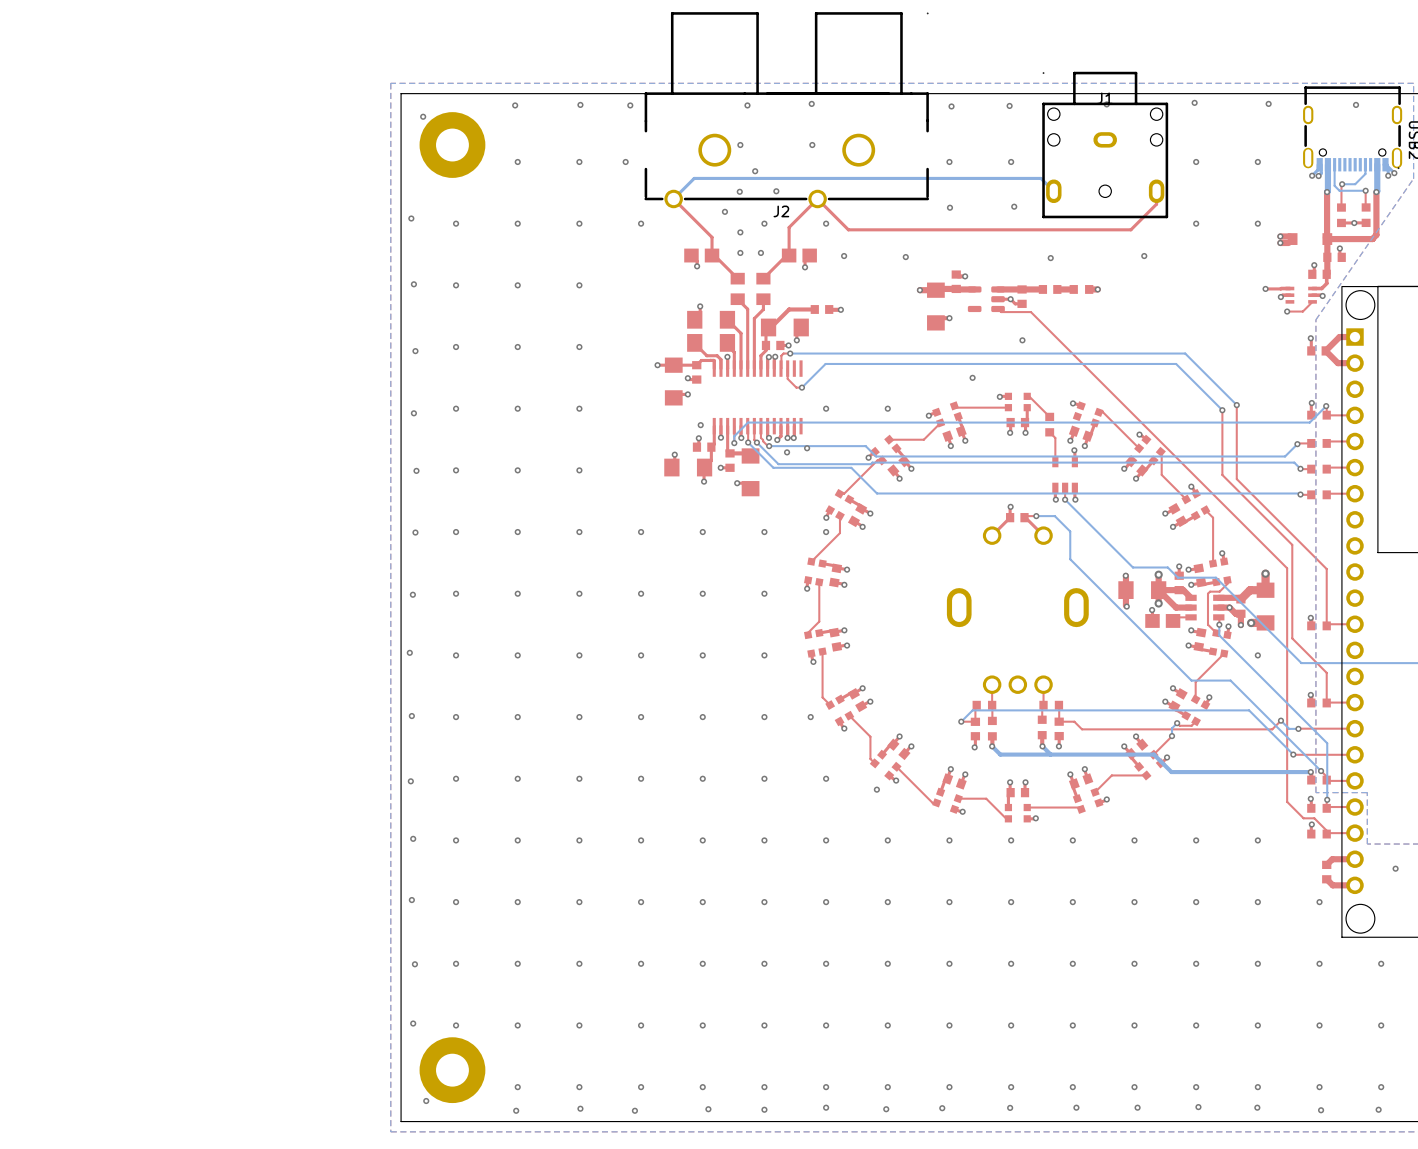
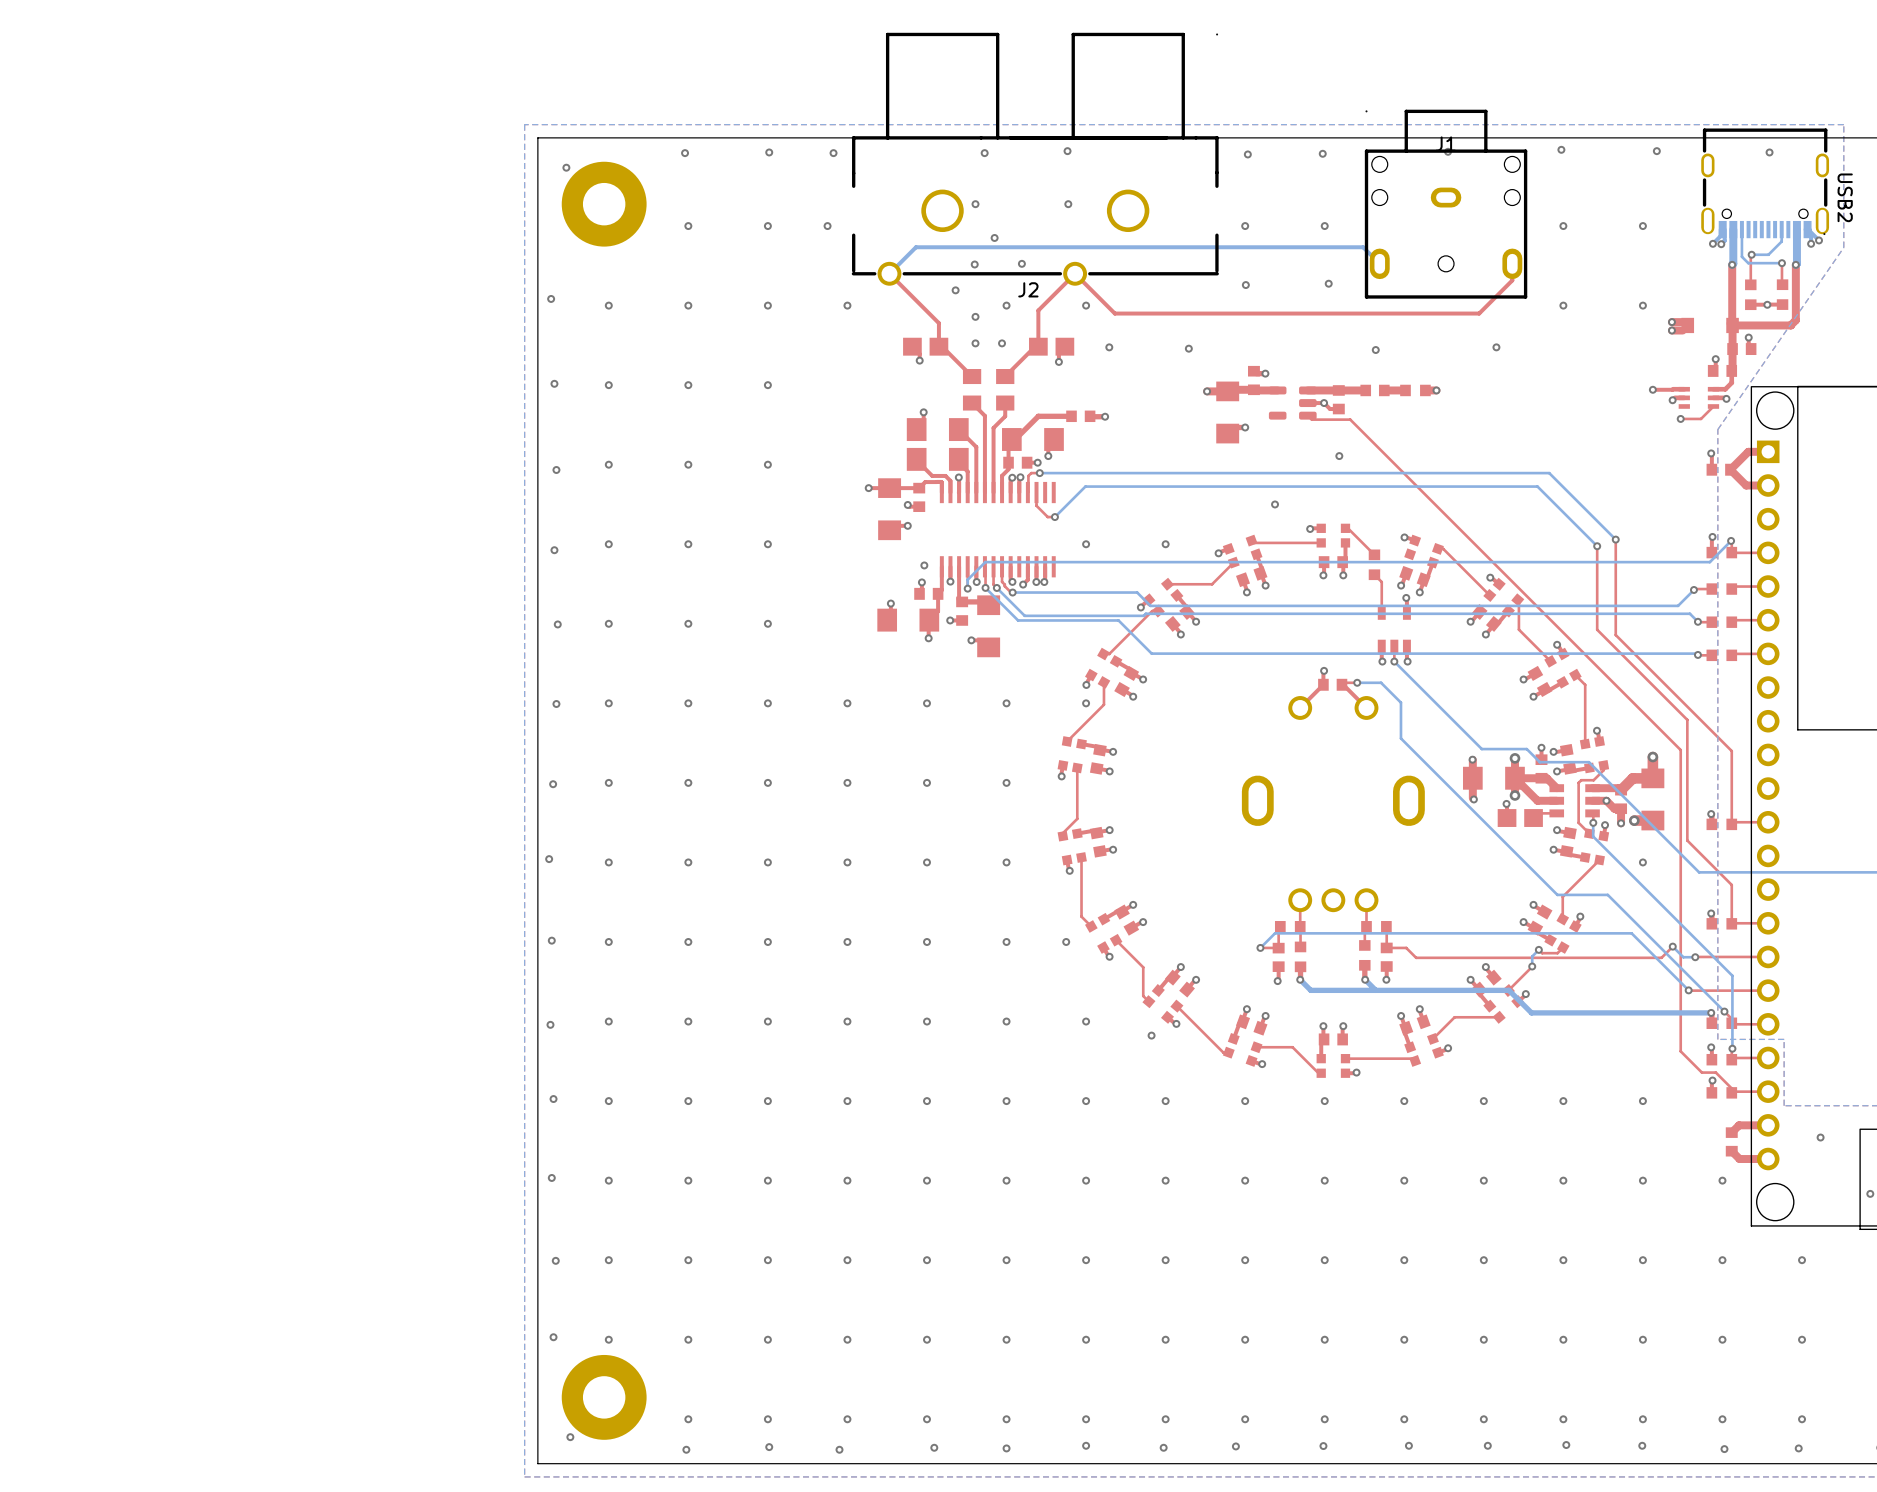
via: (807, 448) -> none
via: (787, 452) -> none

